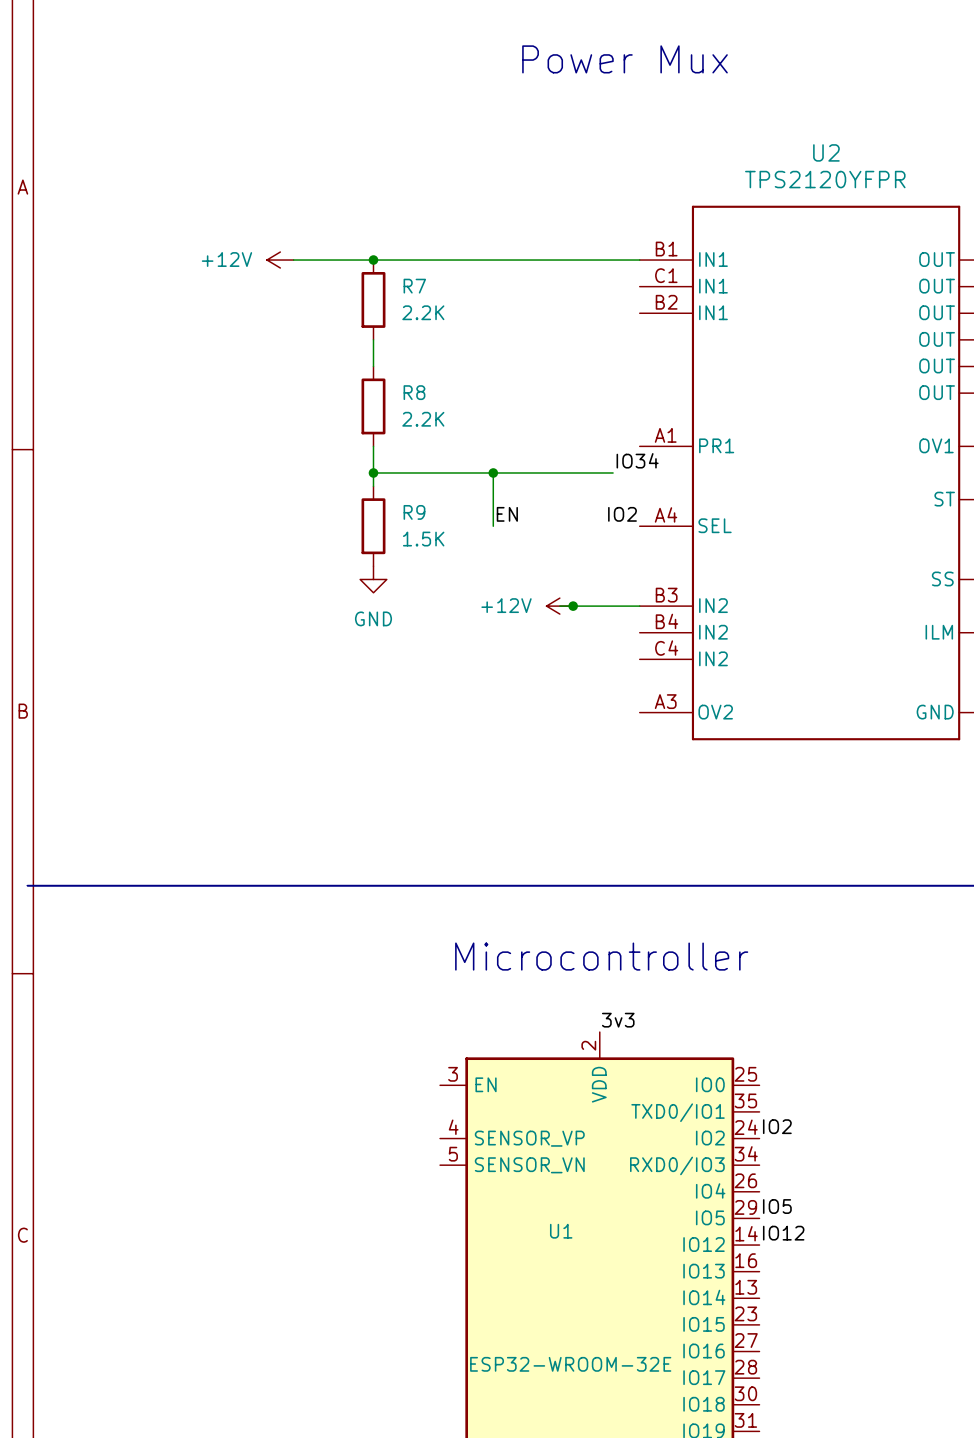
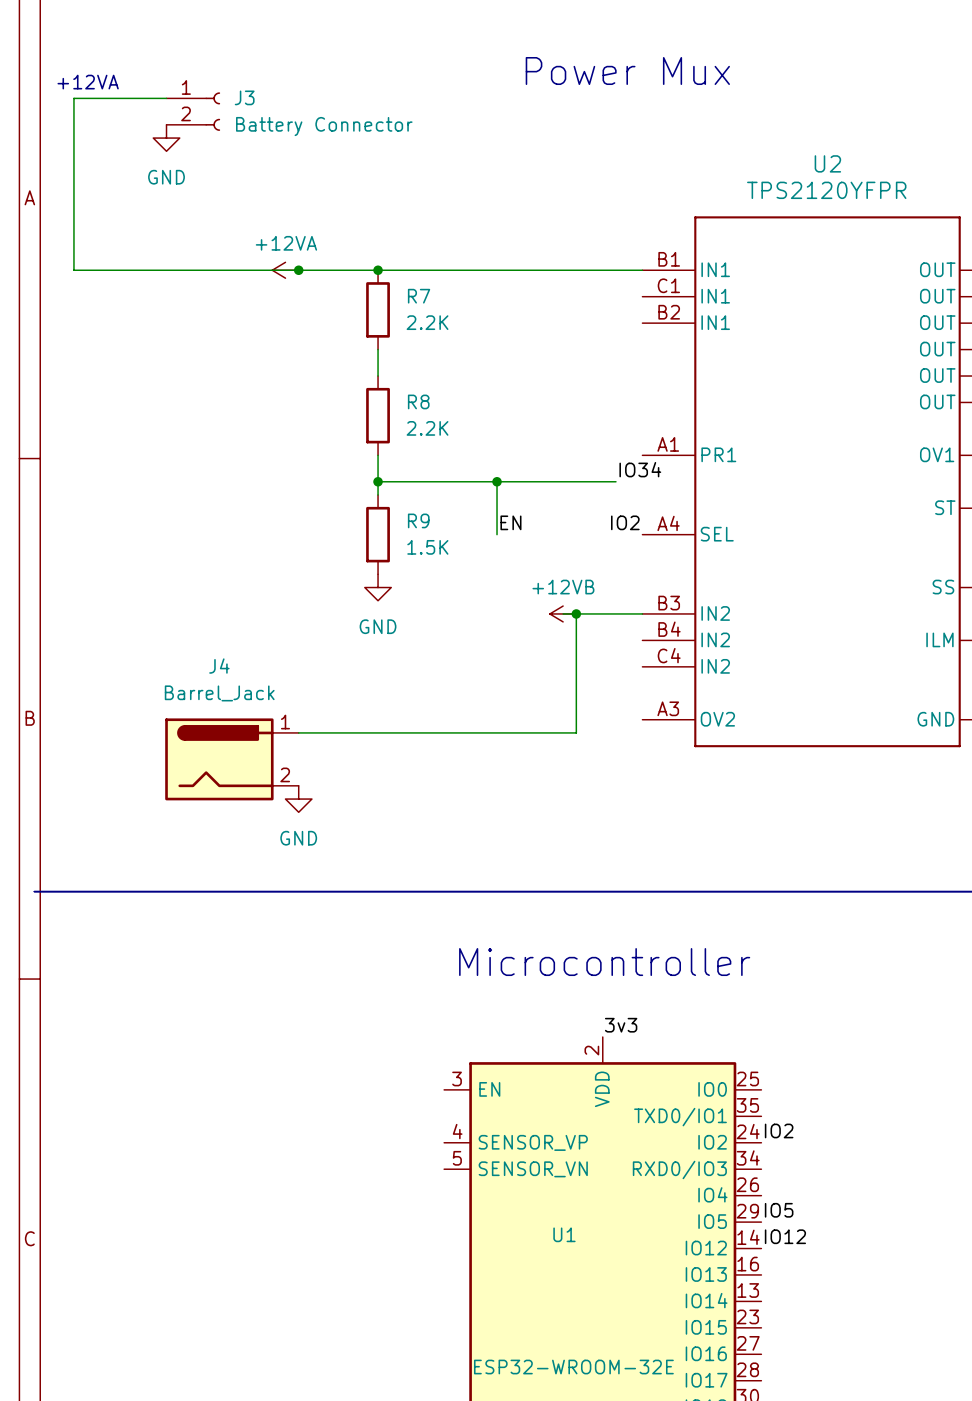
text: none -> +12VA (88, 82)
wire: none -> (166, 98) (73, 98) (73, 270) (298, 270)
J3: none -> Battery Connector (193, 111)
power symbol: none -> GND (166, 138)
power symbol: +12V (280, 260) -> +12VA (285, 270)
junction: none -> (298, 270)
power symbol: +12V (559, 606) -> +12VB (563, 613)
wire: none -> (576, 613) (576, 732) (298, 732)
J4: none -> Barrel_Jack (231, 759)
power symbol: none -> GND (298, 799)

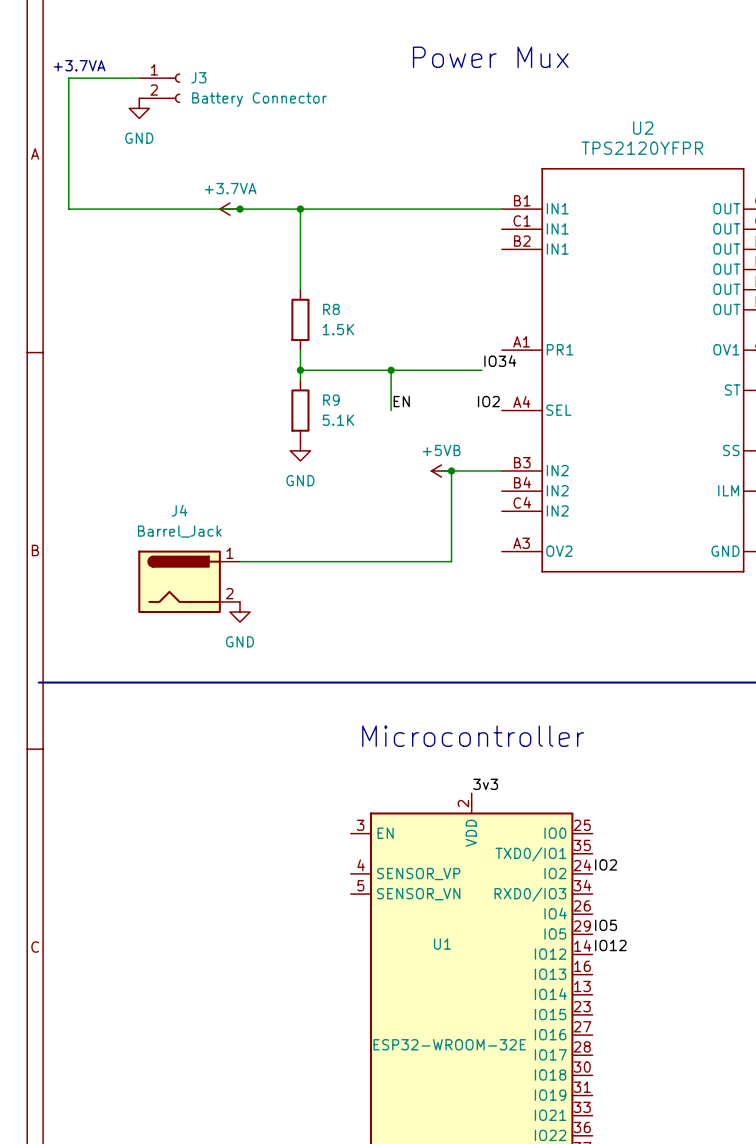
text: +12VA (88, 82) -> +3.7VA (79, 65)
power symbol: +12VA (285, 270) -> +3.7VA (229, 209)
wire: none -> (300, 209) (300, 269)
R7: 2.2K (378, 309) -> none
R8 value: 2.2K (427, 428) -> 1.5K (338, 329)
R9 value: 1.5K (427, 547) -> 5.1K (338, 420)
power symbol: +12VB (563, 613) -> +5VB (441, 471)

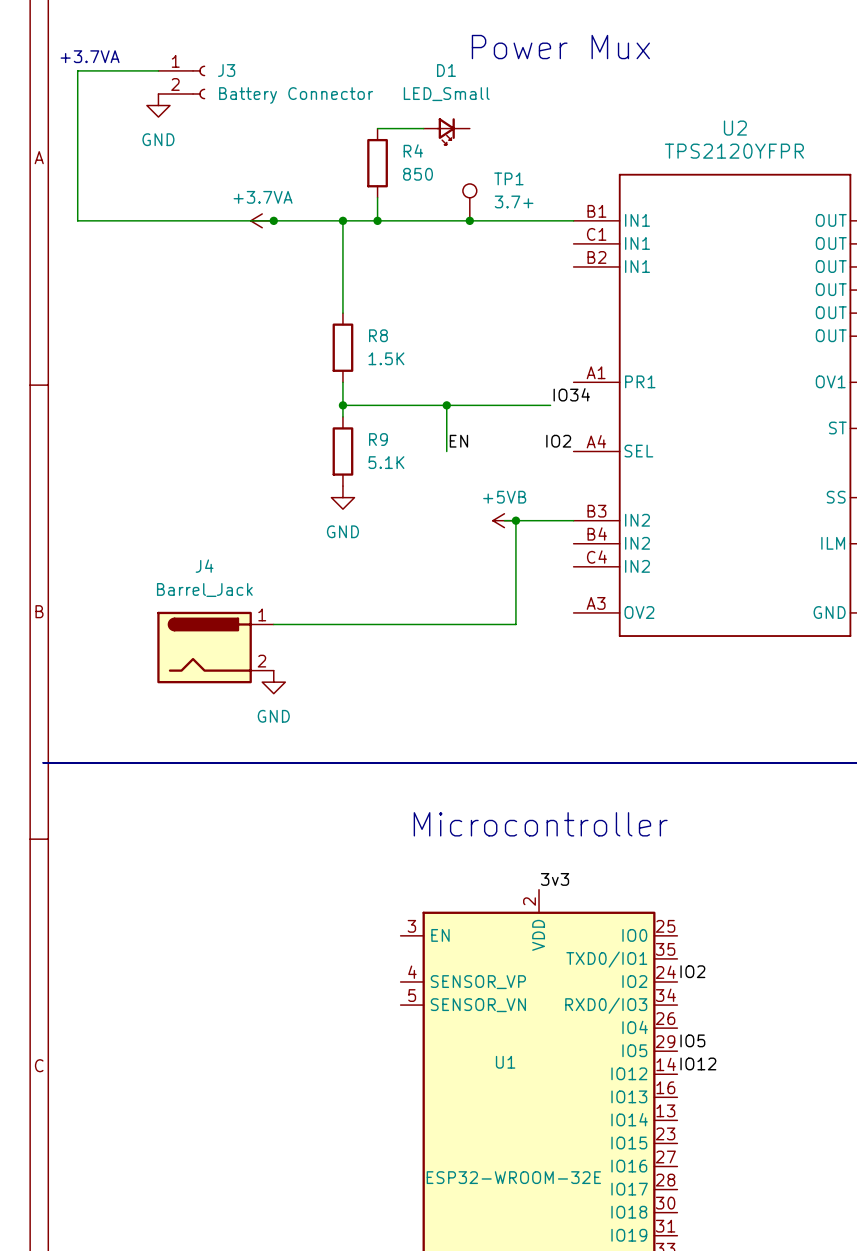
wire: none -> (377, 128) (423, 128)
D1: none -> LED_Small (446, 131)
R4: none -> 850 (377, 163)
wire: none -> (377, 197) (377, 220)
TP1: none -> 3.7+ (469, 202)
junction: none -> (377, 220)
junction: none -> (469, 220)

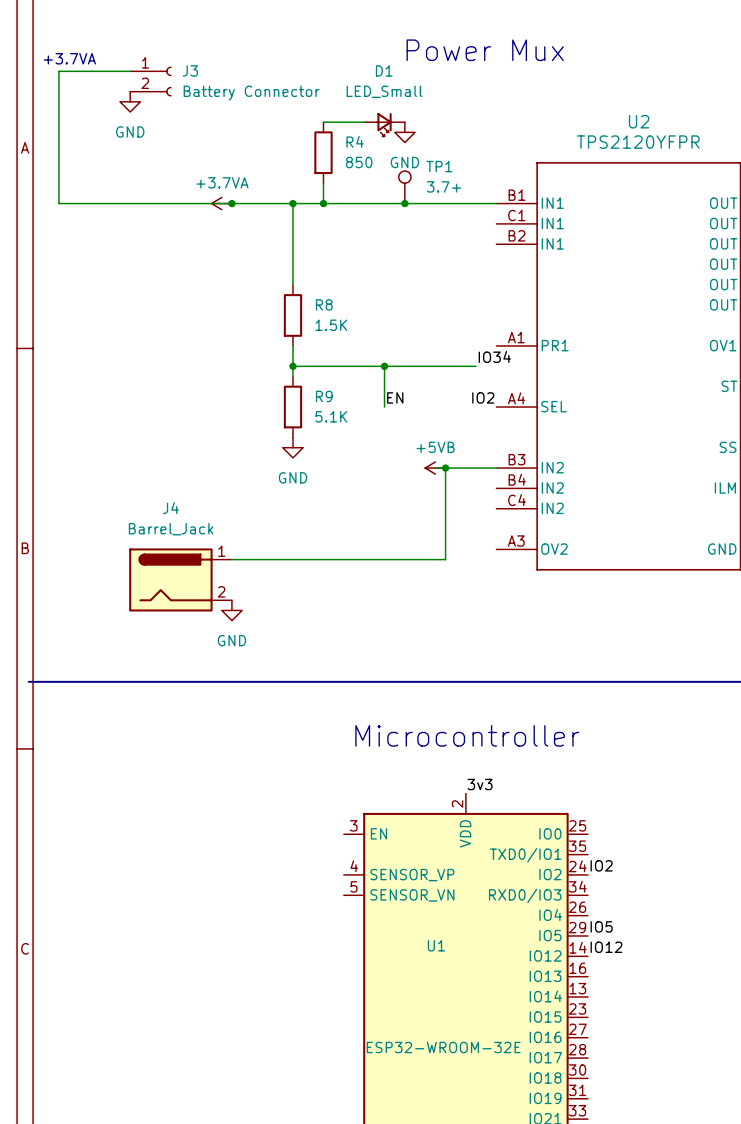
power symbol: none -> GND (404, 132)

